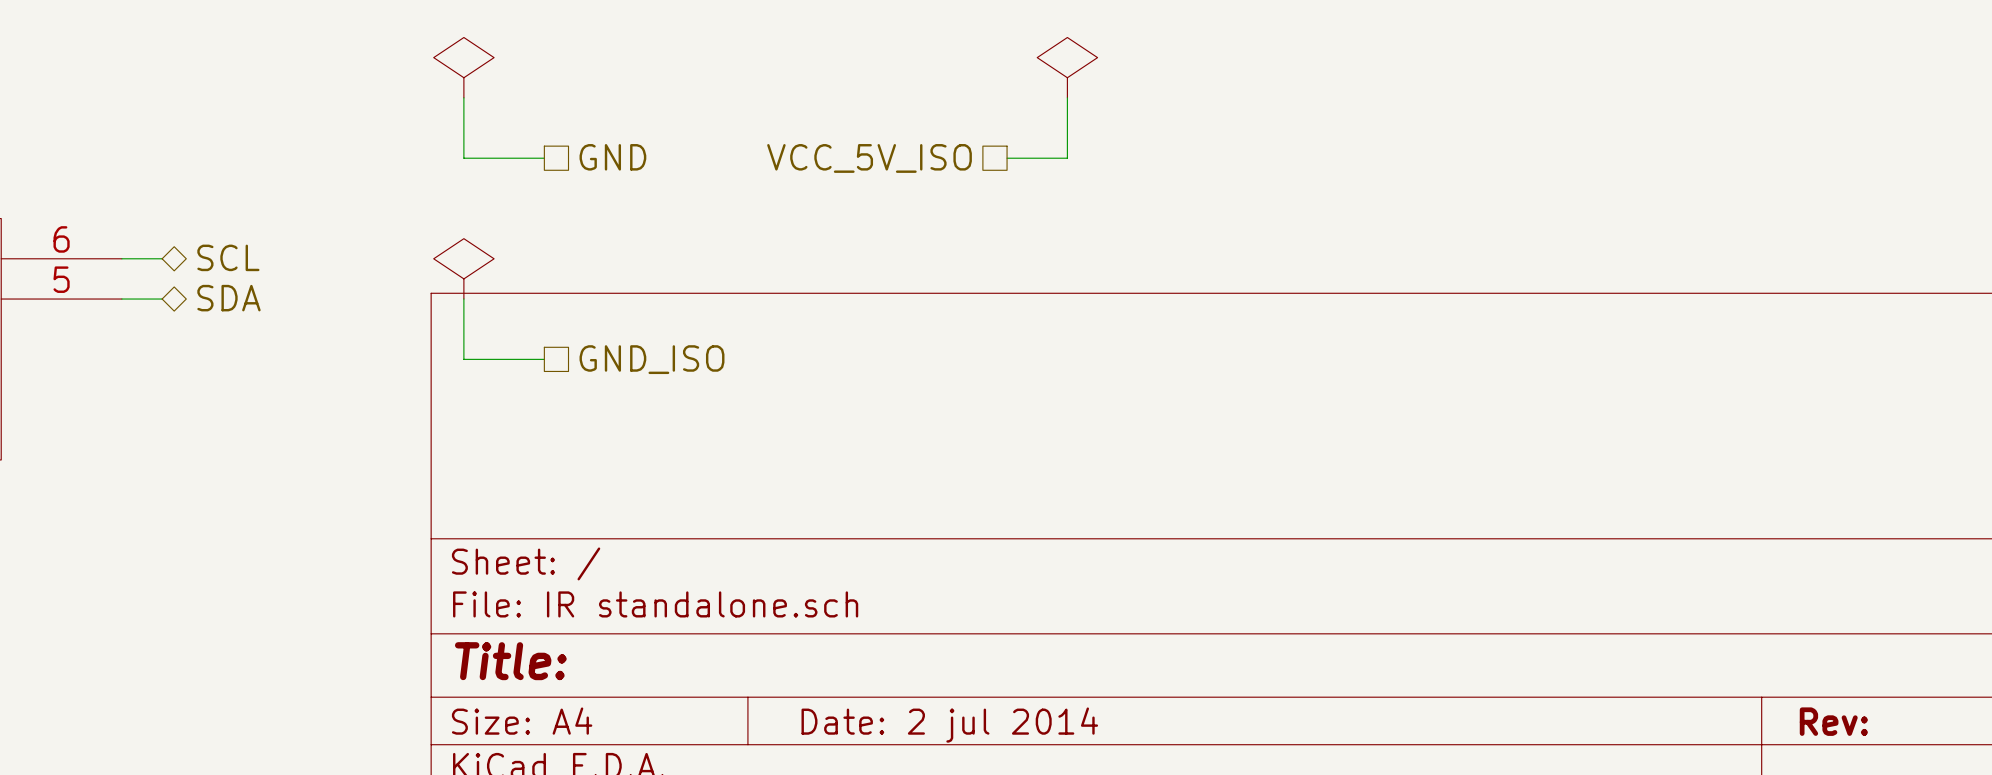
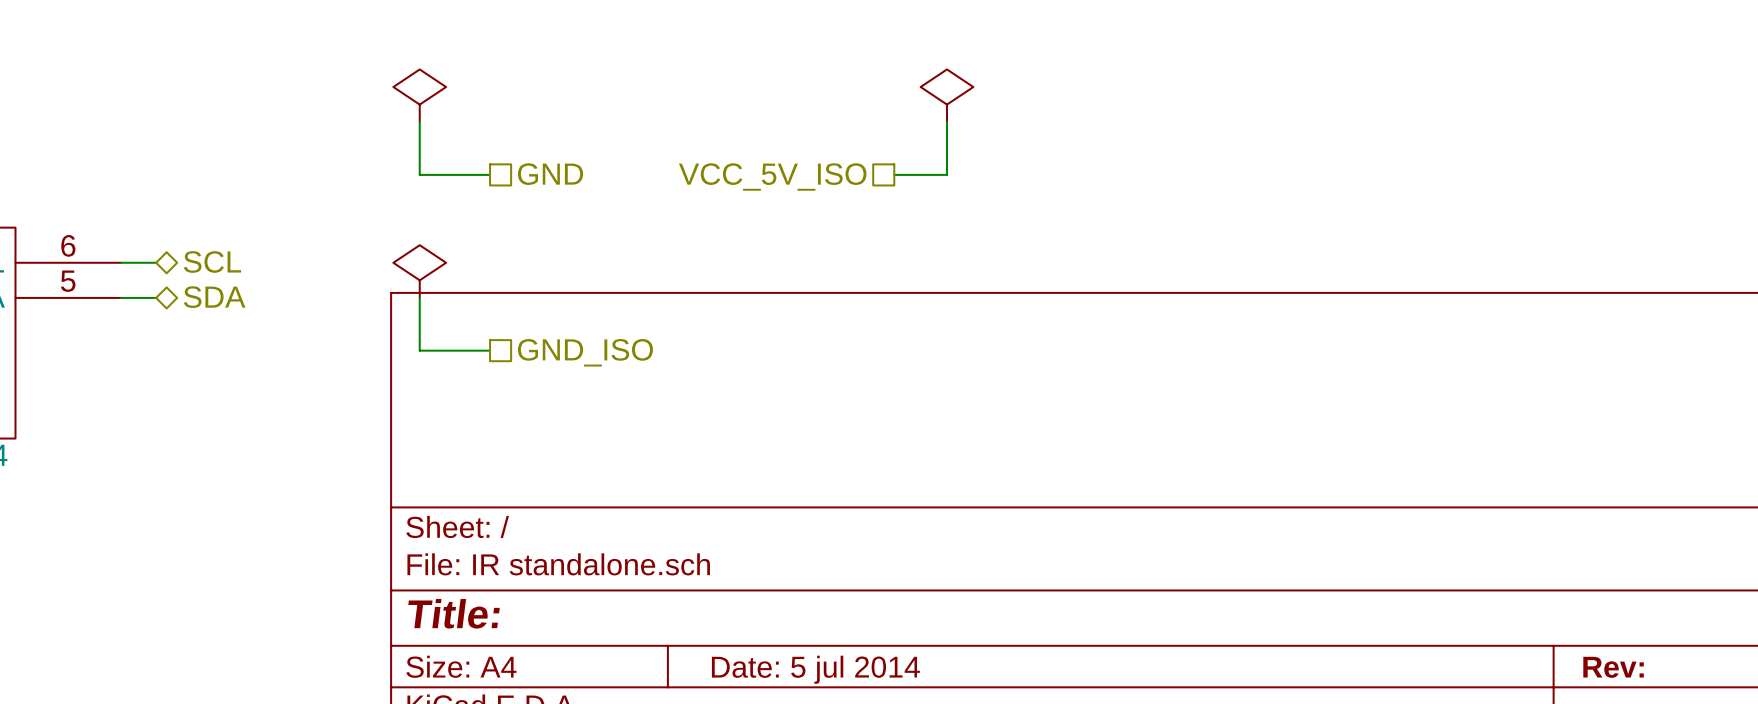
title block: Date: 2 jul 2014 (949, 725) -> Date: 5 jul 2014 (815, 669)

